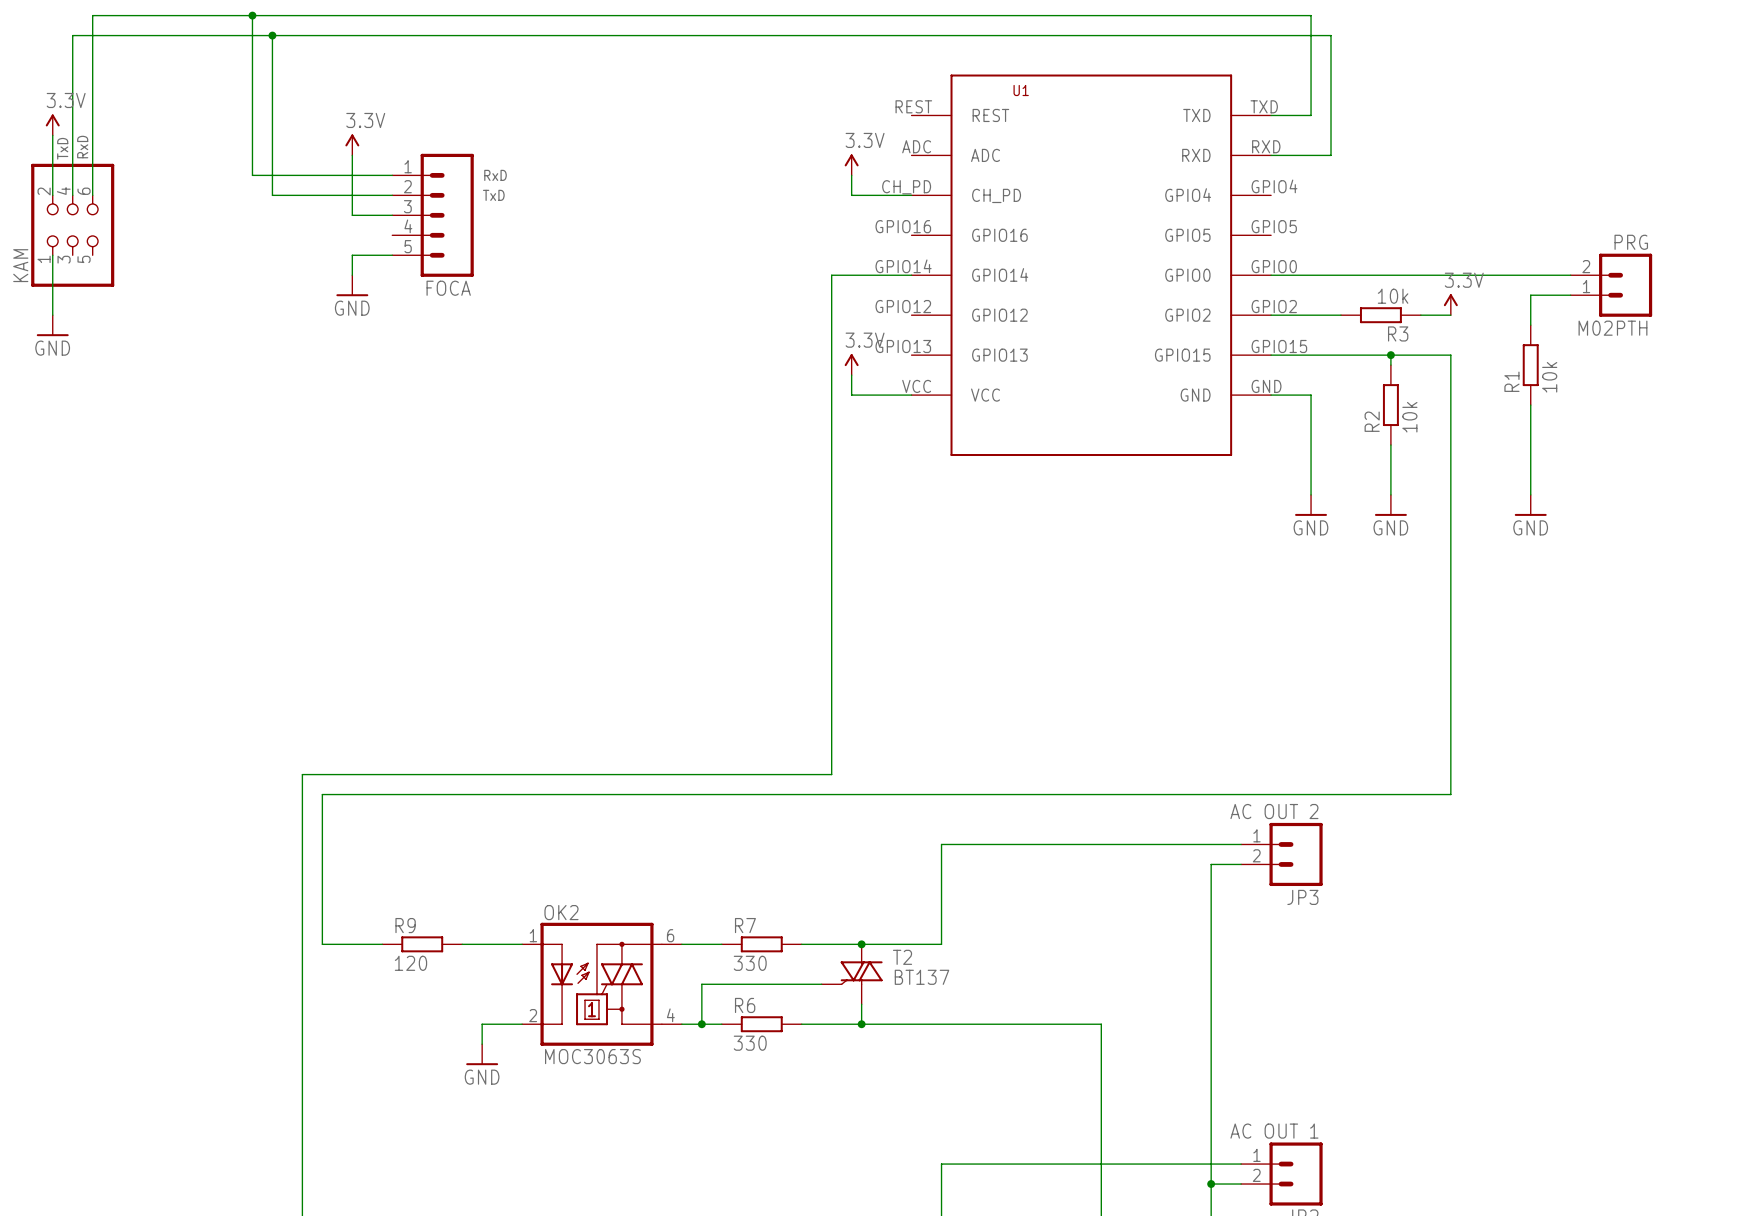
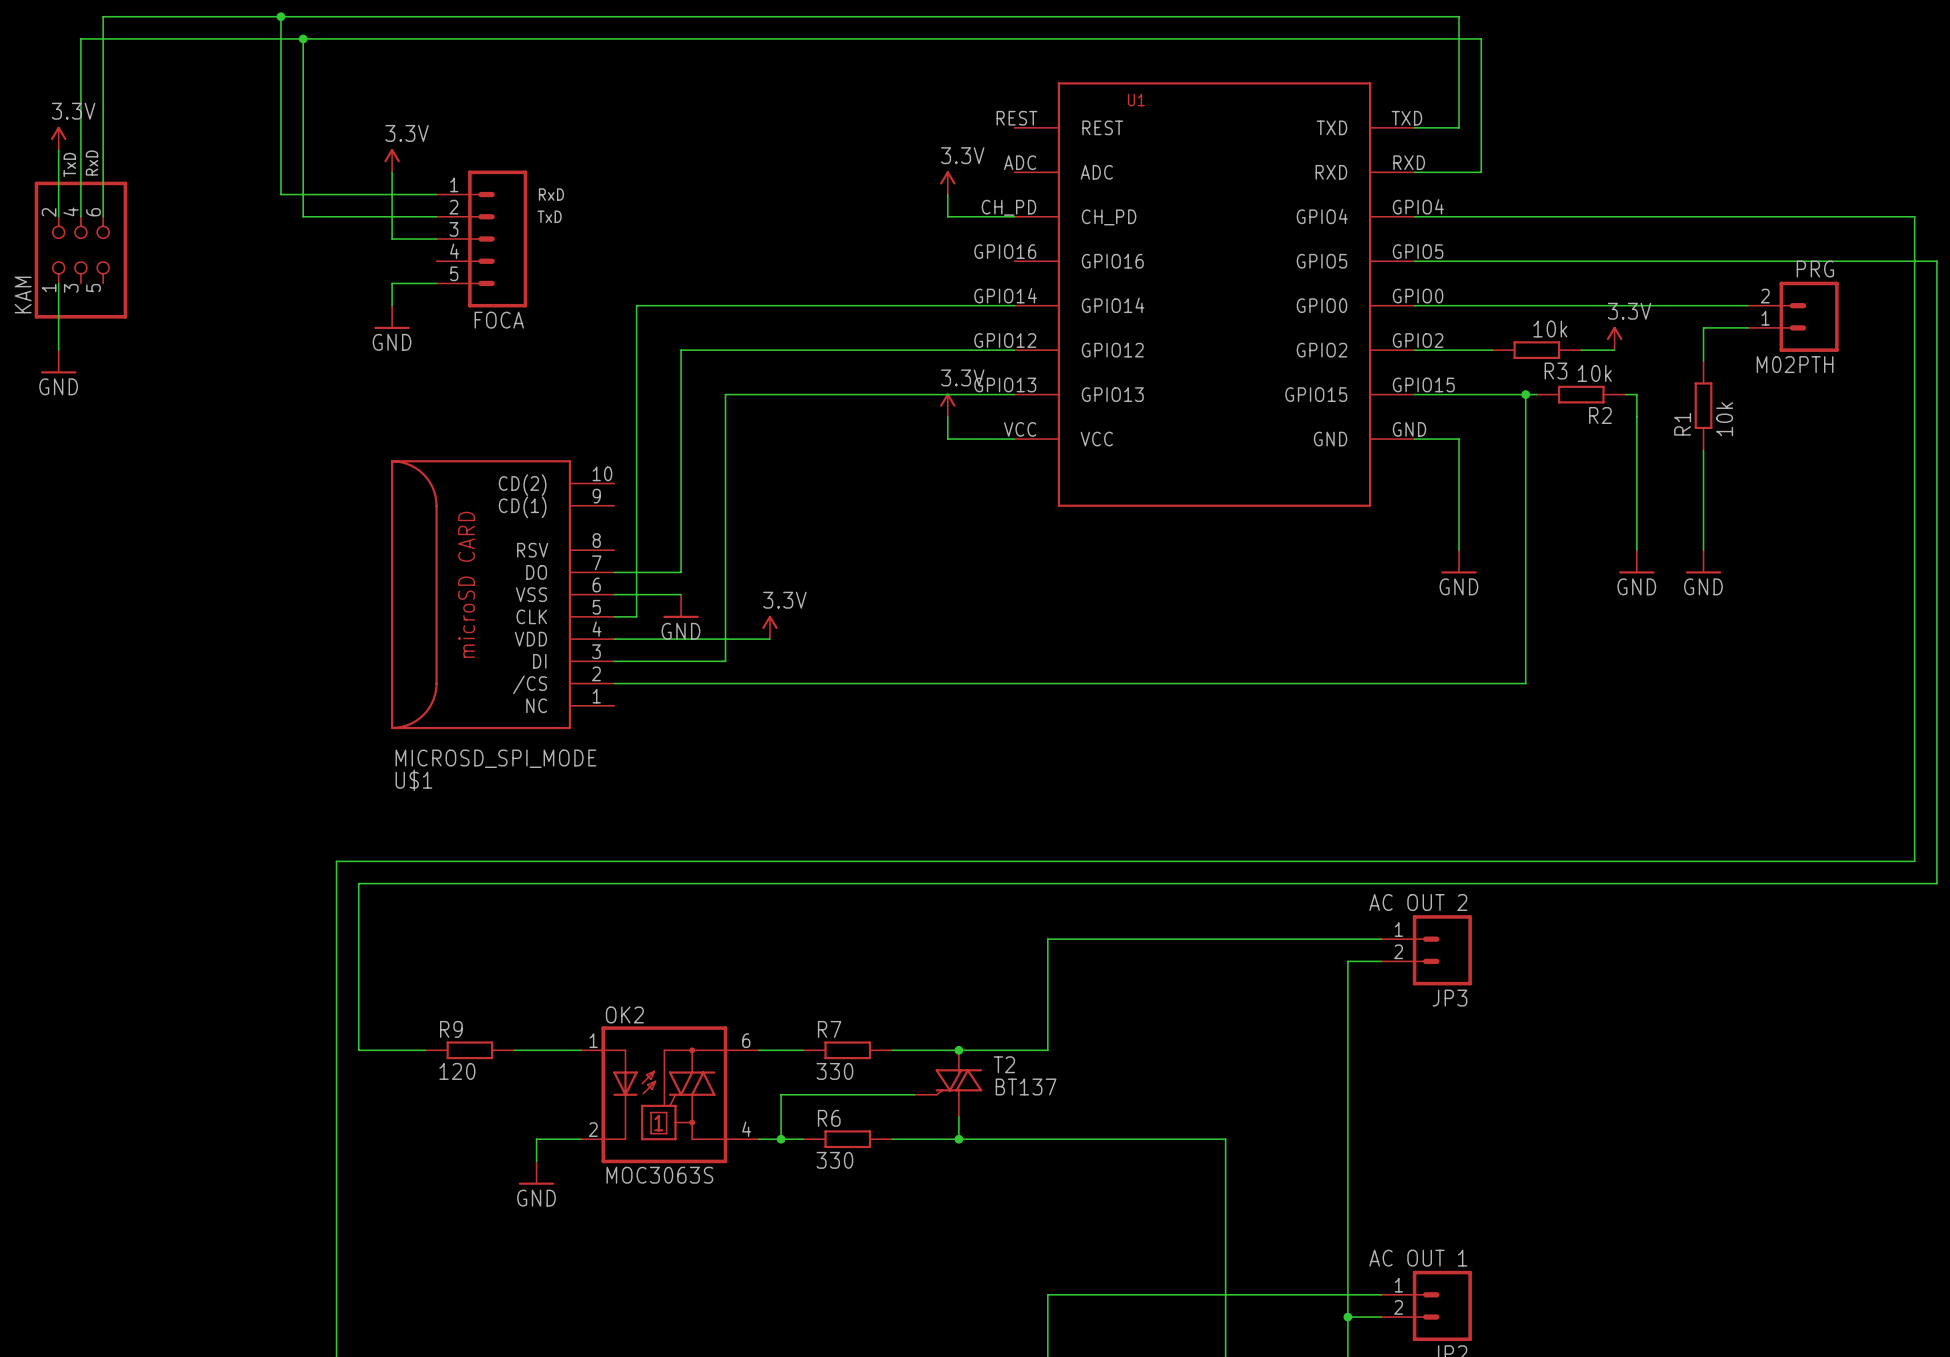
wire: none -> (1414, 216) (1914, 216) (1914, 861) (925, 861)
wire: (831, 275) (831, 774) -> (925, 305) (636, 305) (636, 616) (614, 616)
wire: none -> (1014, 350) (681, 350) (681, 572) (614, 572)
wire: none -> (1014, 394) (725, 394) (725, 661) (614, 661)
wire: none -> (1525, 394) (1525, 683) (614, 683)
wire: (1380, 355) (1450, 355) (1450, 794) -> (1414, 261) (1936, 261) (1936, 883) (1614, 883)
wire: (1390, 355) (1390, 365) -> none
junction position: (1390, 355) -> (1525, 394)
wire: none -> (1625, 394) (1636, 394) (1636, 550)
R2 rotation: 0° (1390, 405) -> 90° clockwise (1581, 394)
R2 position: (1390, 405) -> (1581, 394)
R2 value position: 10k (1409, 417) -> 10k (1594, 373)
R2 name position: R2 (1372, 421) -> R2 (1600, 415)
wire: (1390, 445) (1390, 494) -> none
power symbol position: GND (1390, 505) -> GND (1636, 561)
U$1: none -> MICROSD_SPI_MODE (502, 594)
wire: none -> (614, 594) (681, 594)
power symbol: none -> GND (681, 606)
power symbol: none -> 3.3V (769, 627)
wire: none -> (614, 639) (769, 639)

